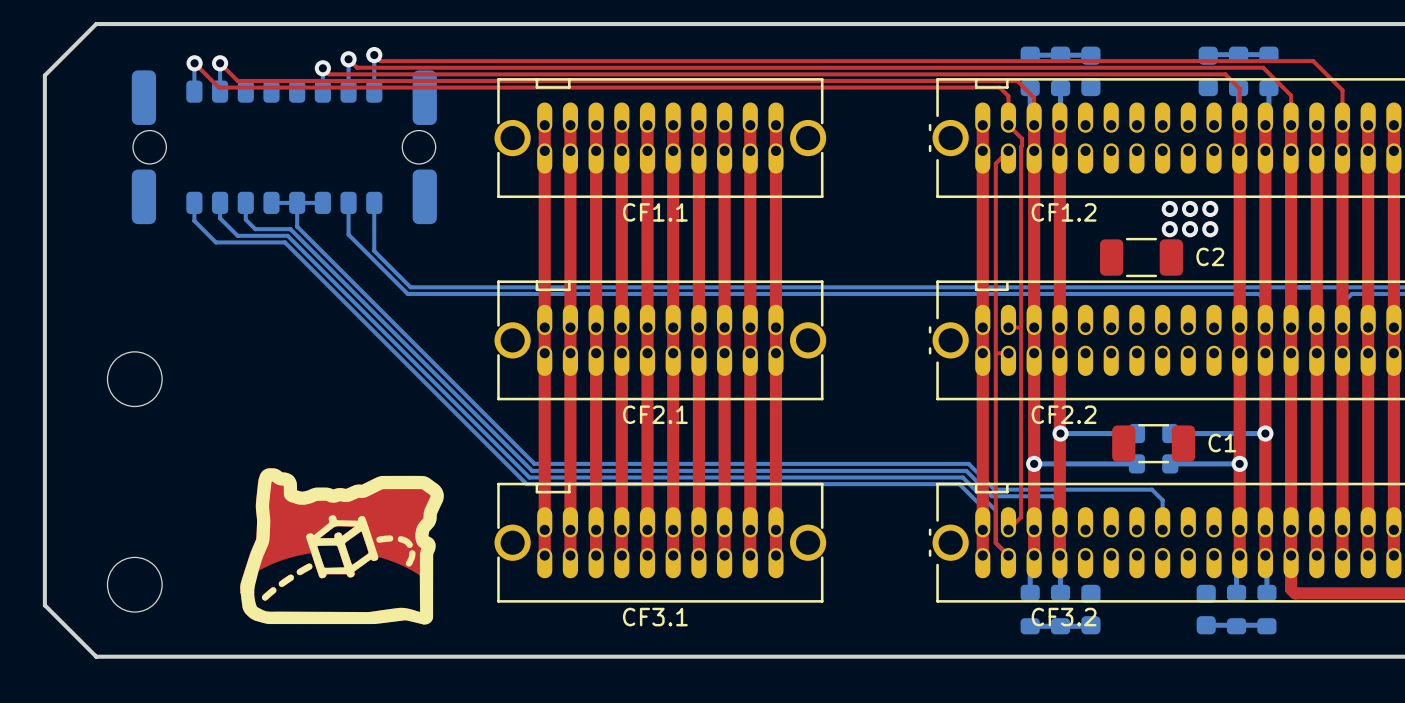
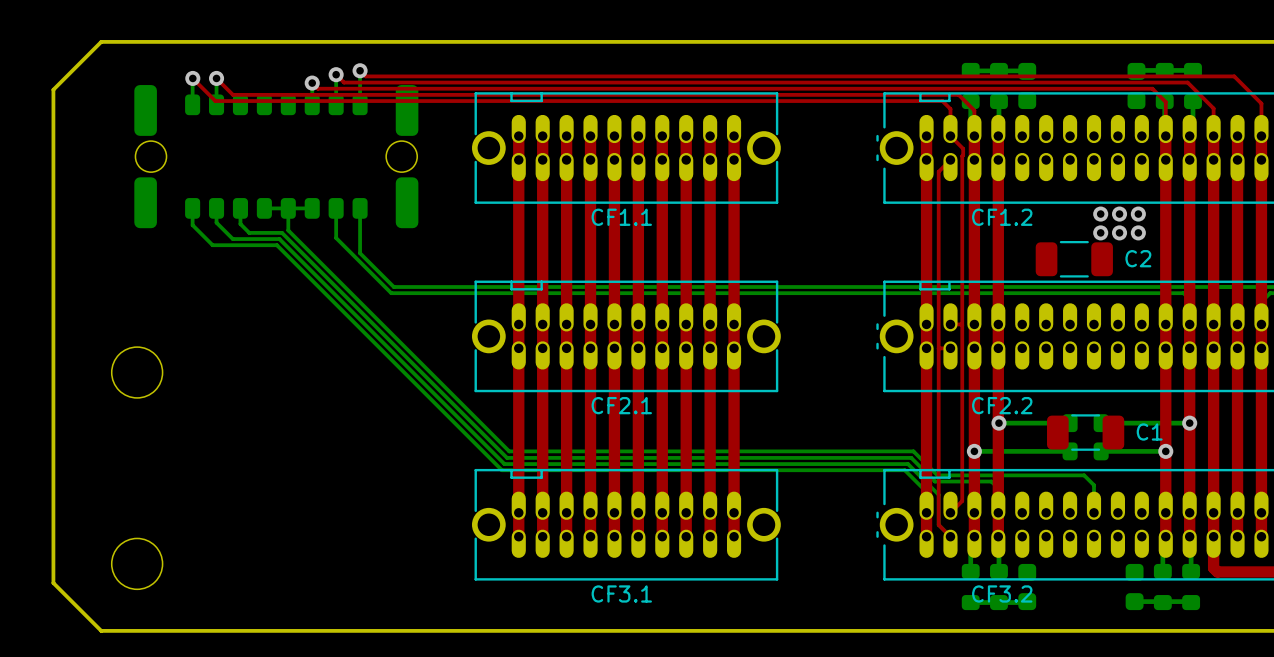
drawing: [240, 468, 444, 625] -> none

